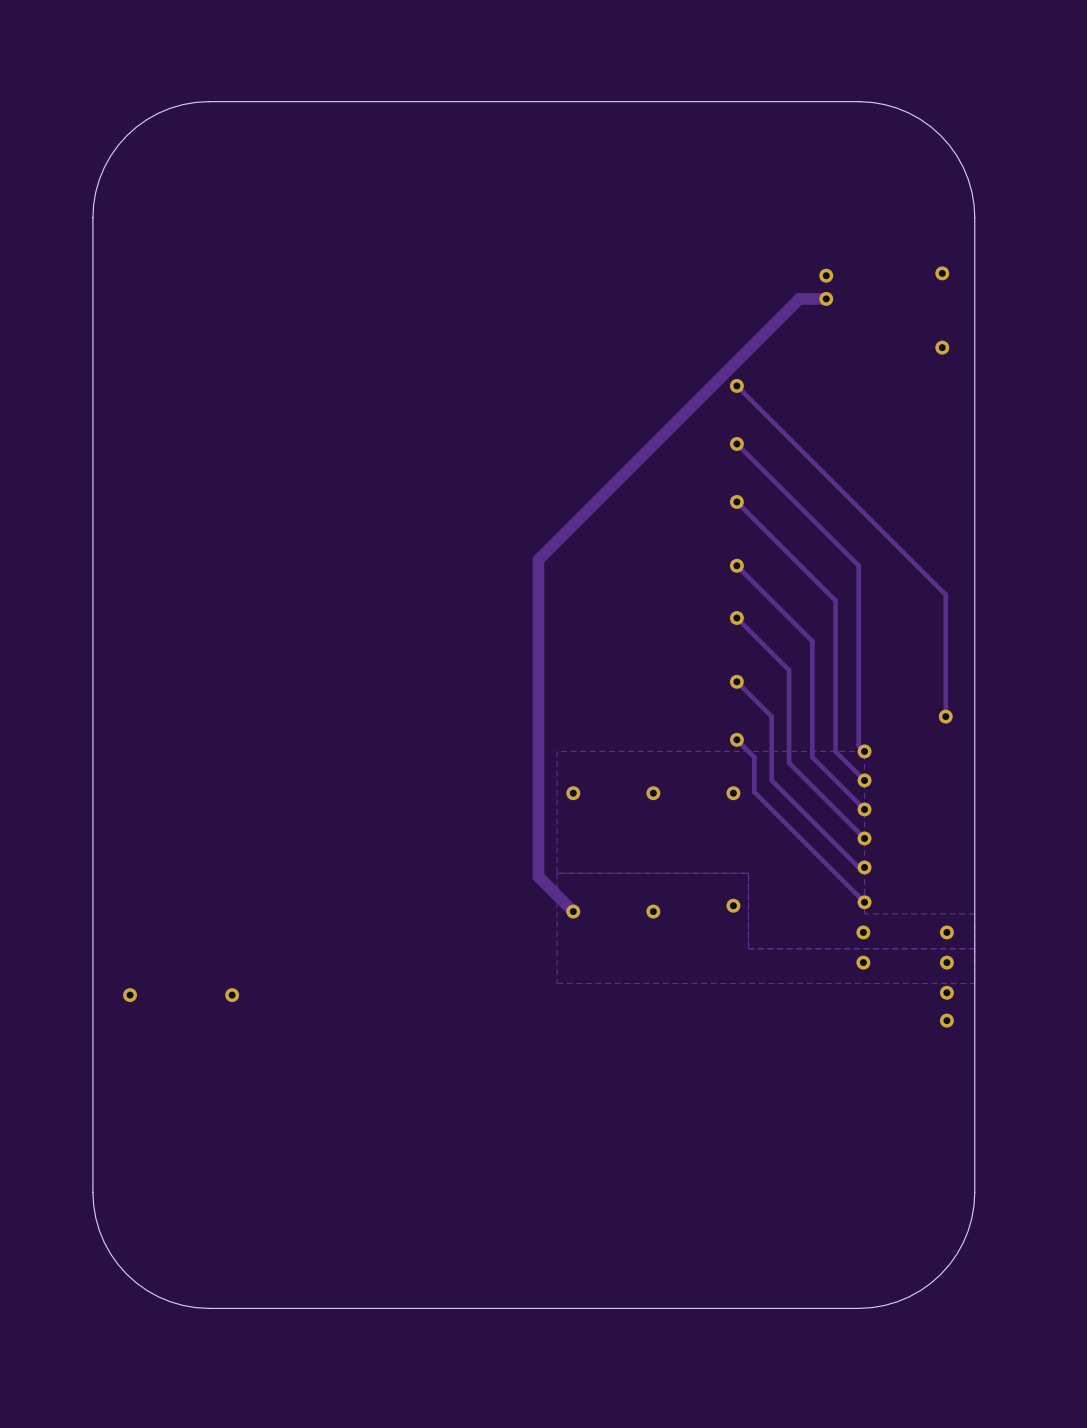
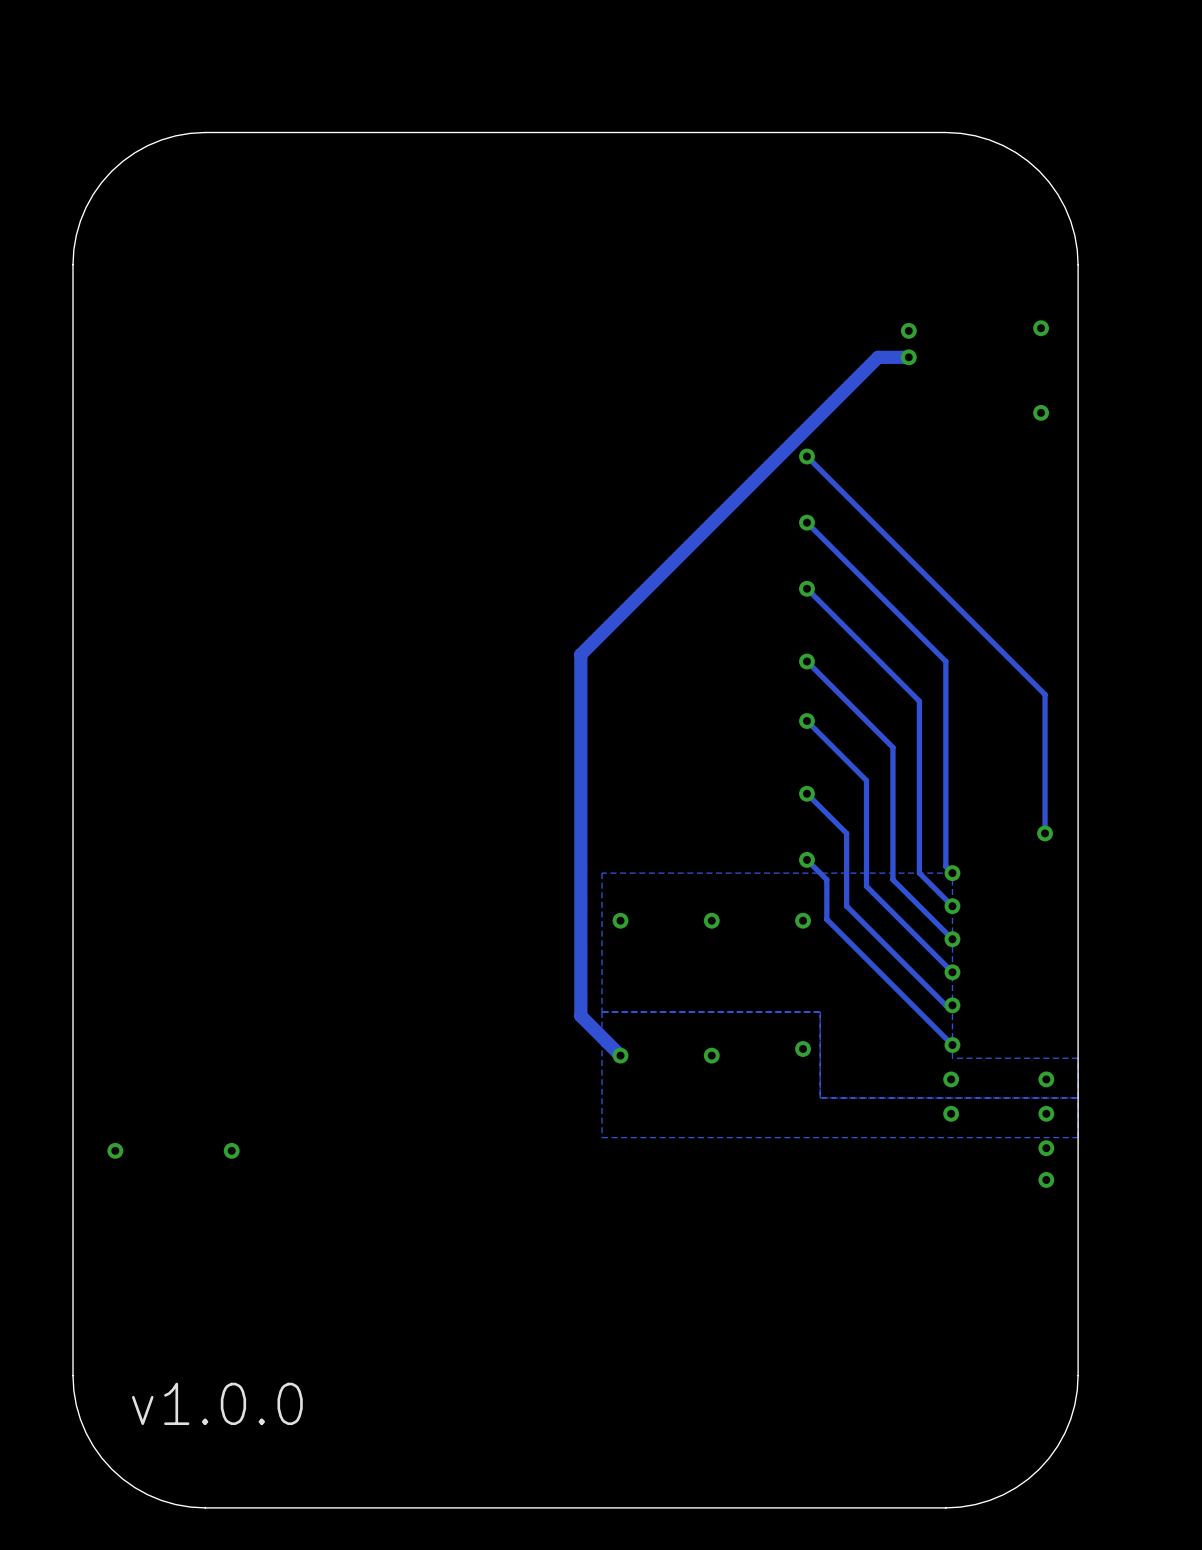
text: none -> v1.0.0 (217, 1403)

